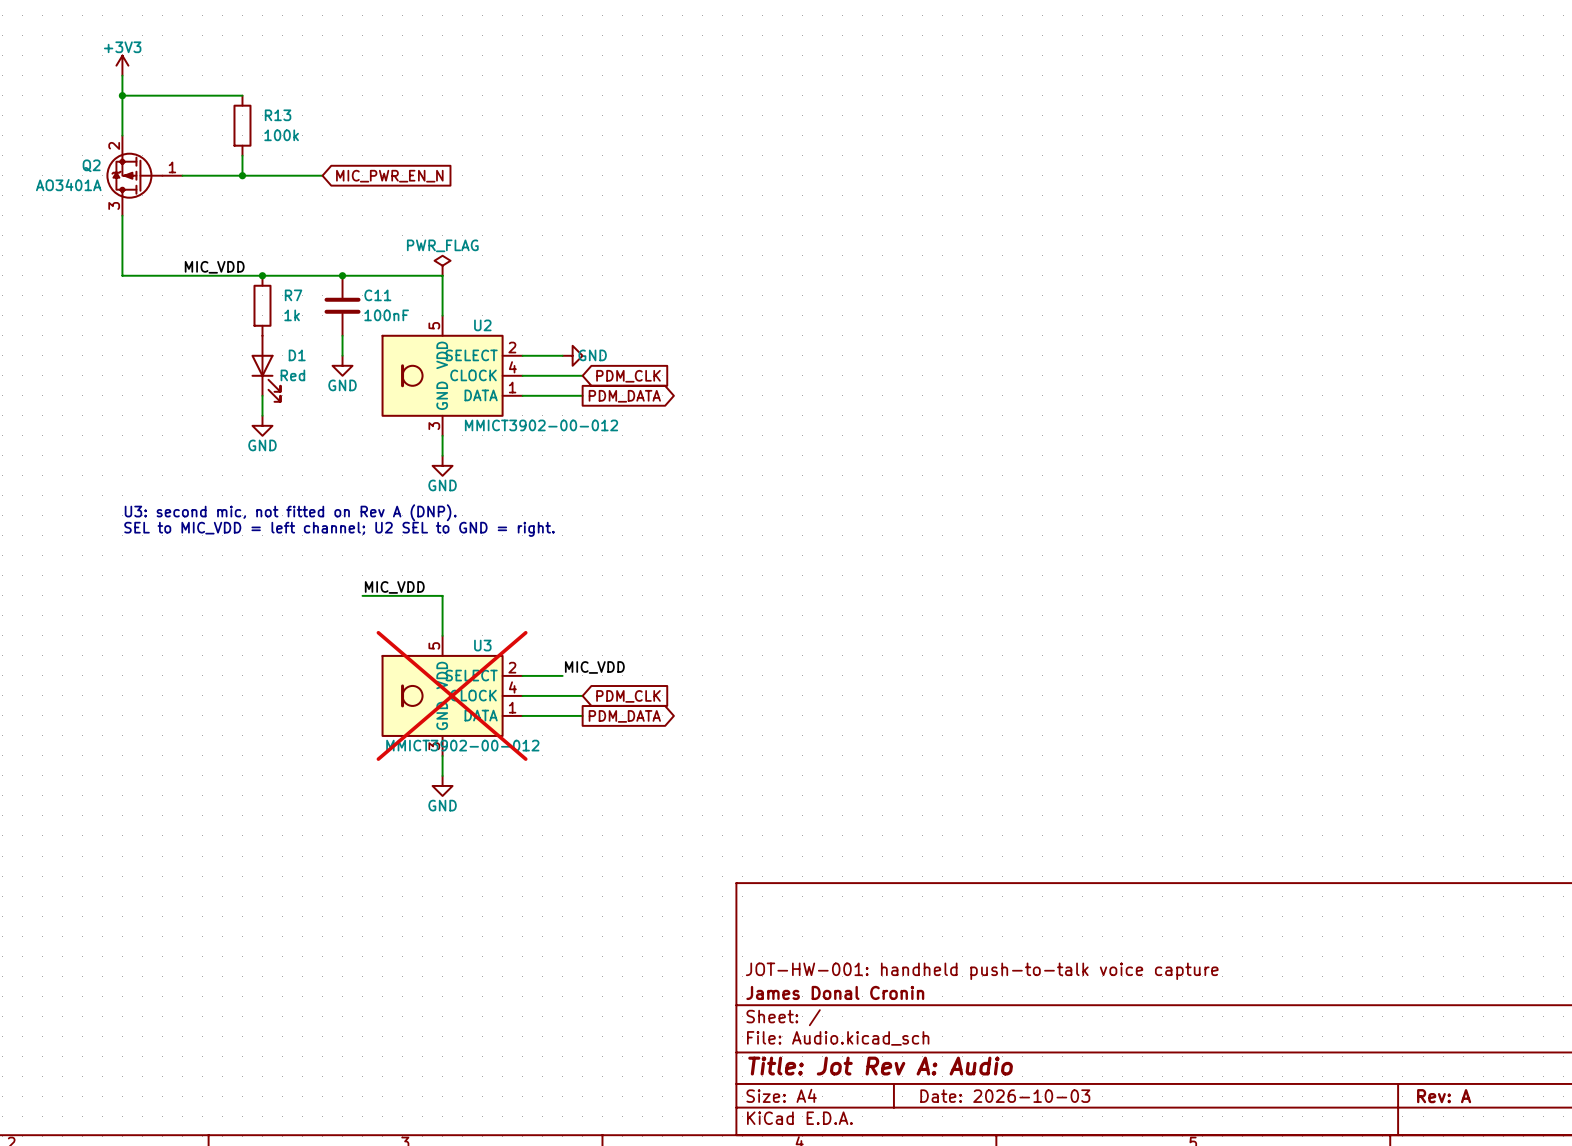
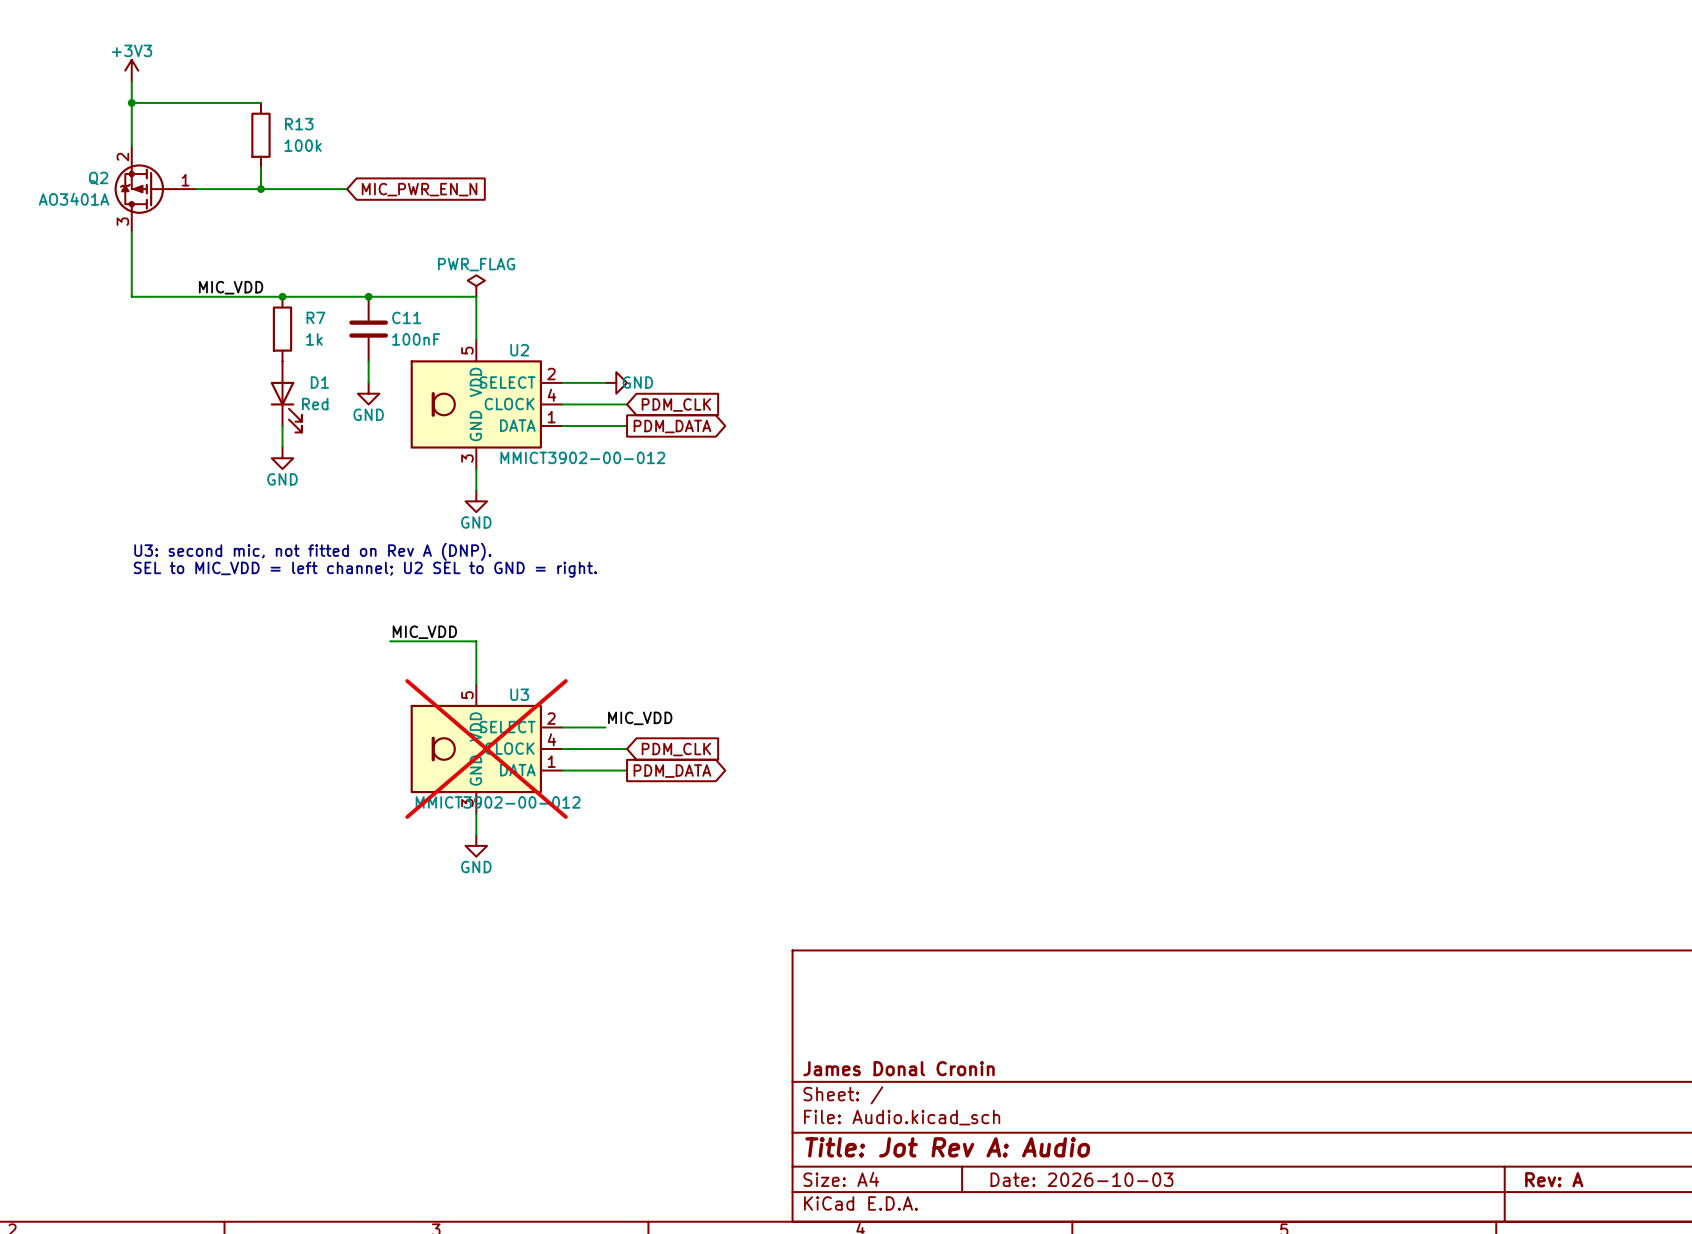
title block: JOT-HW-001: handheld push-to-talk voice capture (982, 971) -> none

